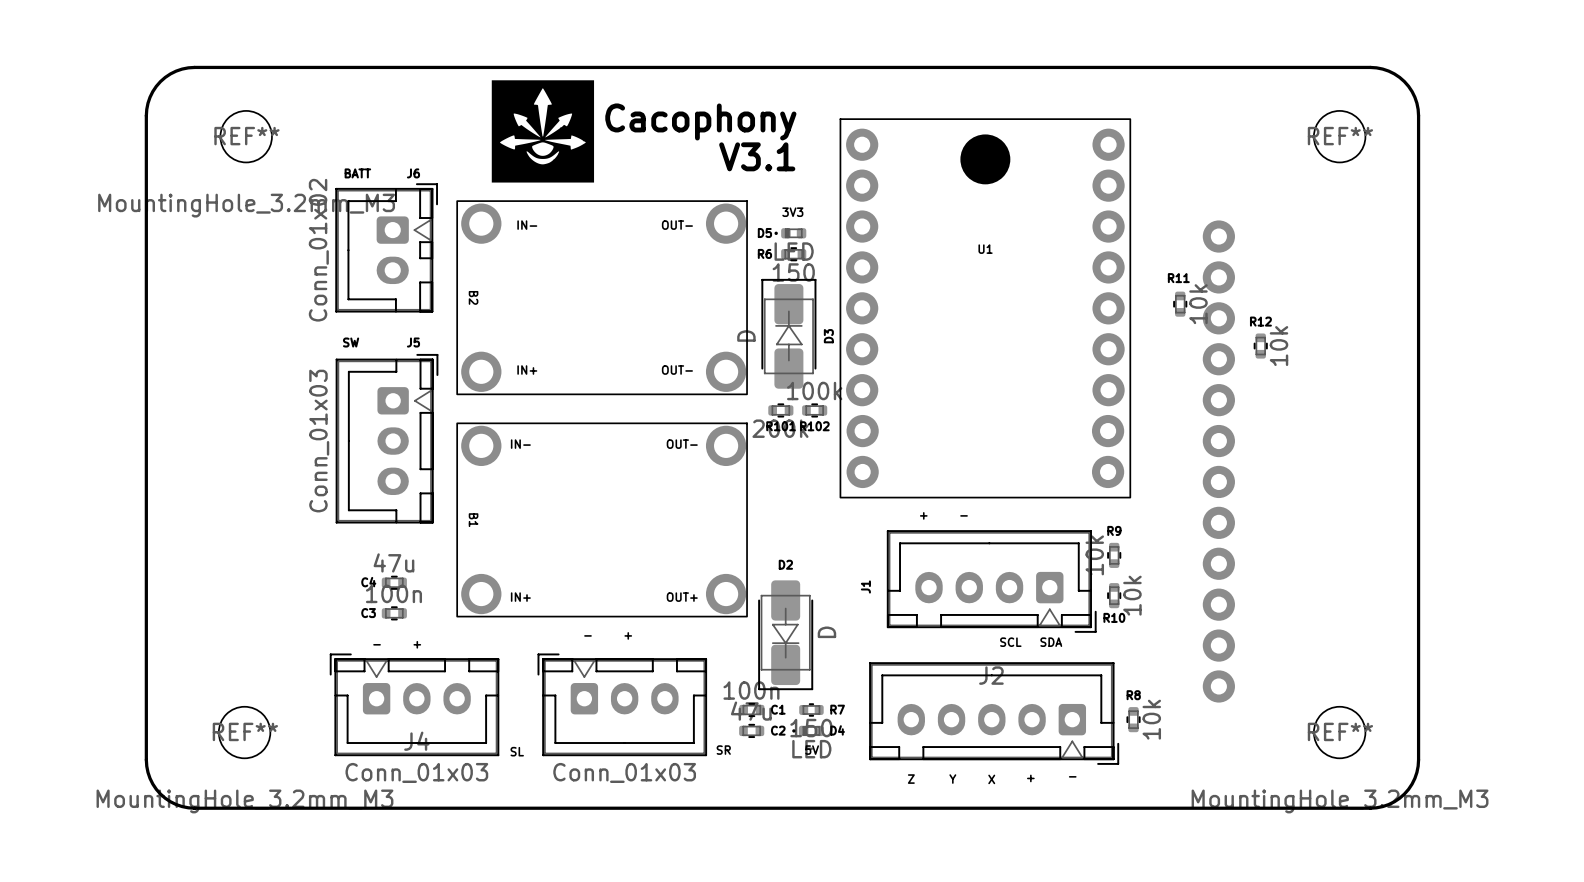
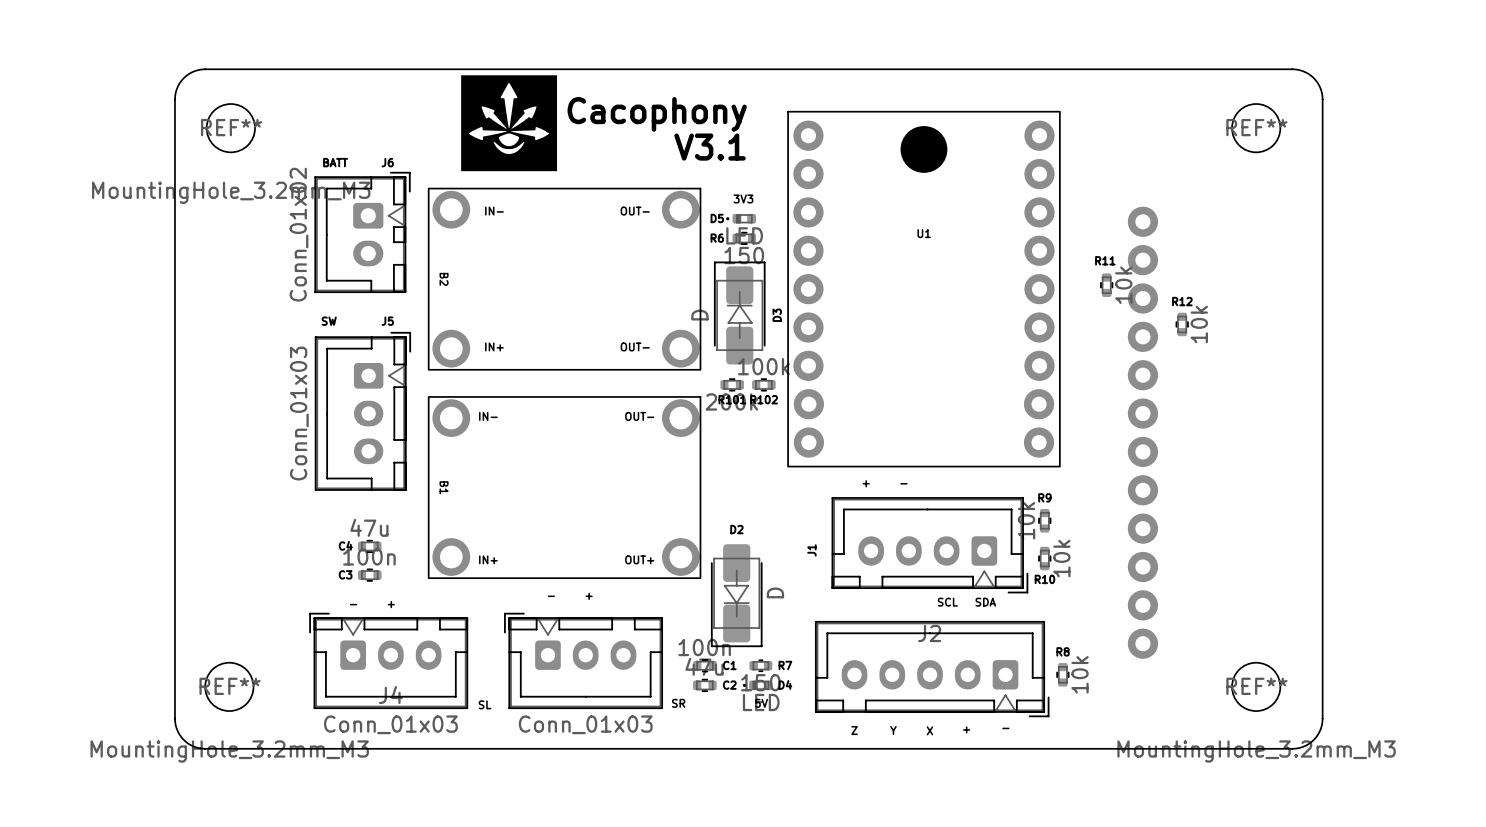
board edge: (194, 67) (1370, 67) (1382, 69) (1394, 73) (1404, 81) (1412, 91) (1416, 103) (1418, 115) (1418, 759) (1416, 772) (1412, 784) (1404, 794) (1394, 801) (1382, 806) (1370, 808) (194, 808) (182, 806) (170, 801) (160, 794) (152, 784) (147, 772) (146, 759) (146, 115) (150, 97) (160, 81) (176, 71) (194, 67) -> (205, 69) (192, 72) (183, 78) (177, 86) (174, 99) (174, 718) (177, 731) (189, 744) (205, 748) (1292, 748) (1305, 745) (1318, 734) (1322, 718) (1322, 99) (1318, 83) (1308, 73) (1292, 69) (205, 69)

